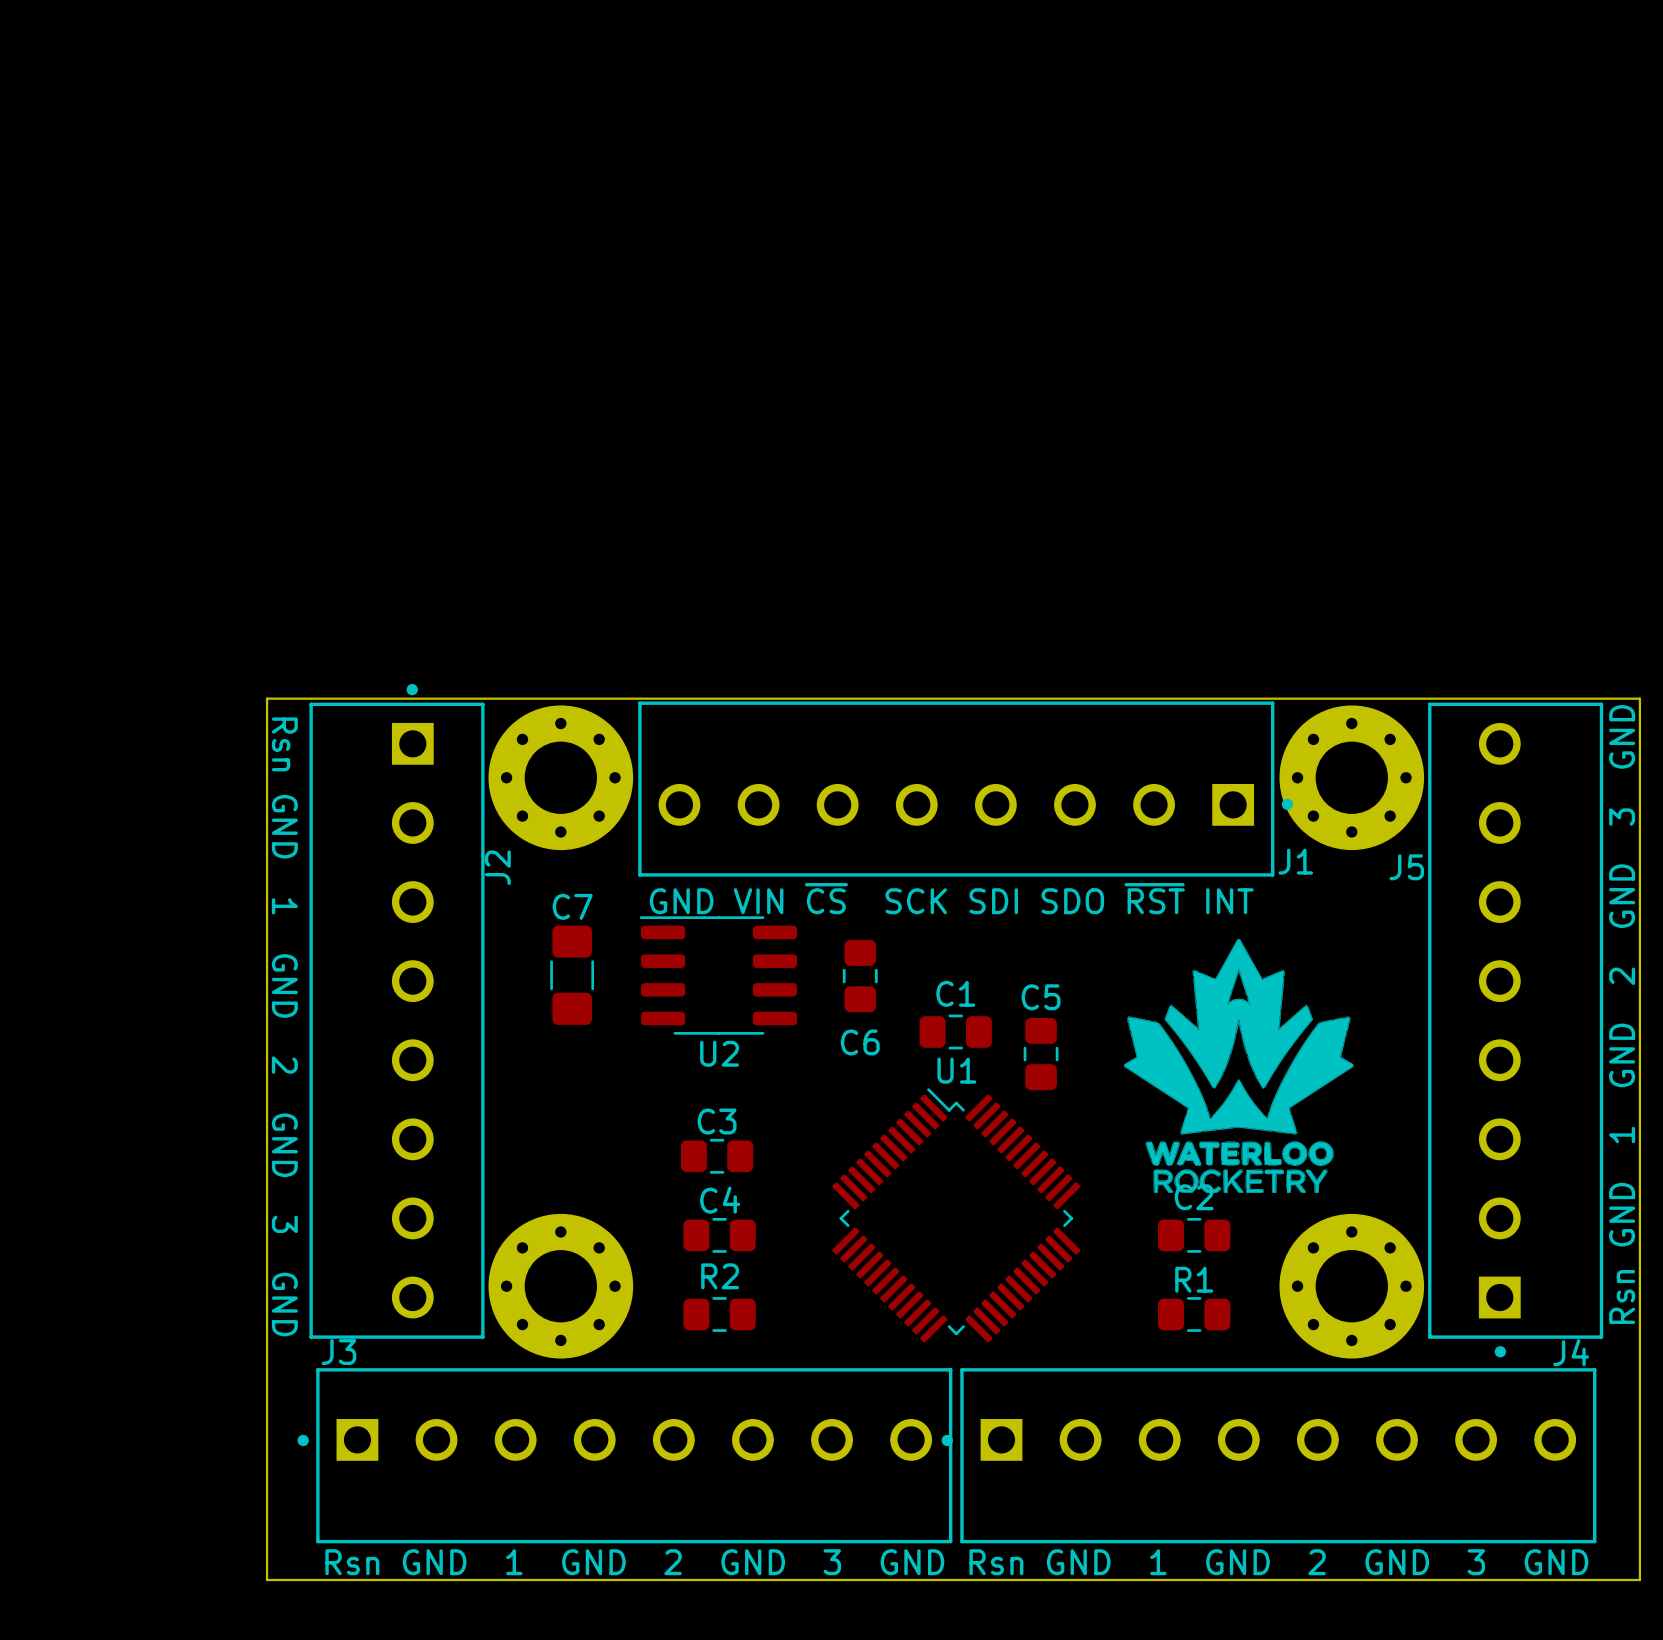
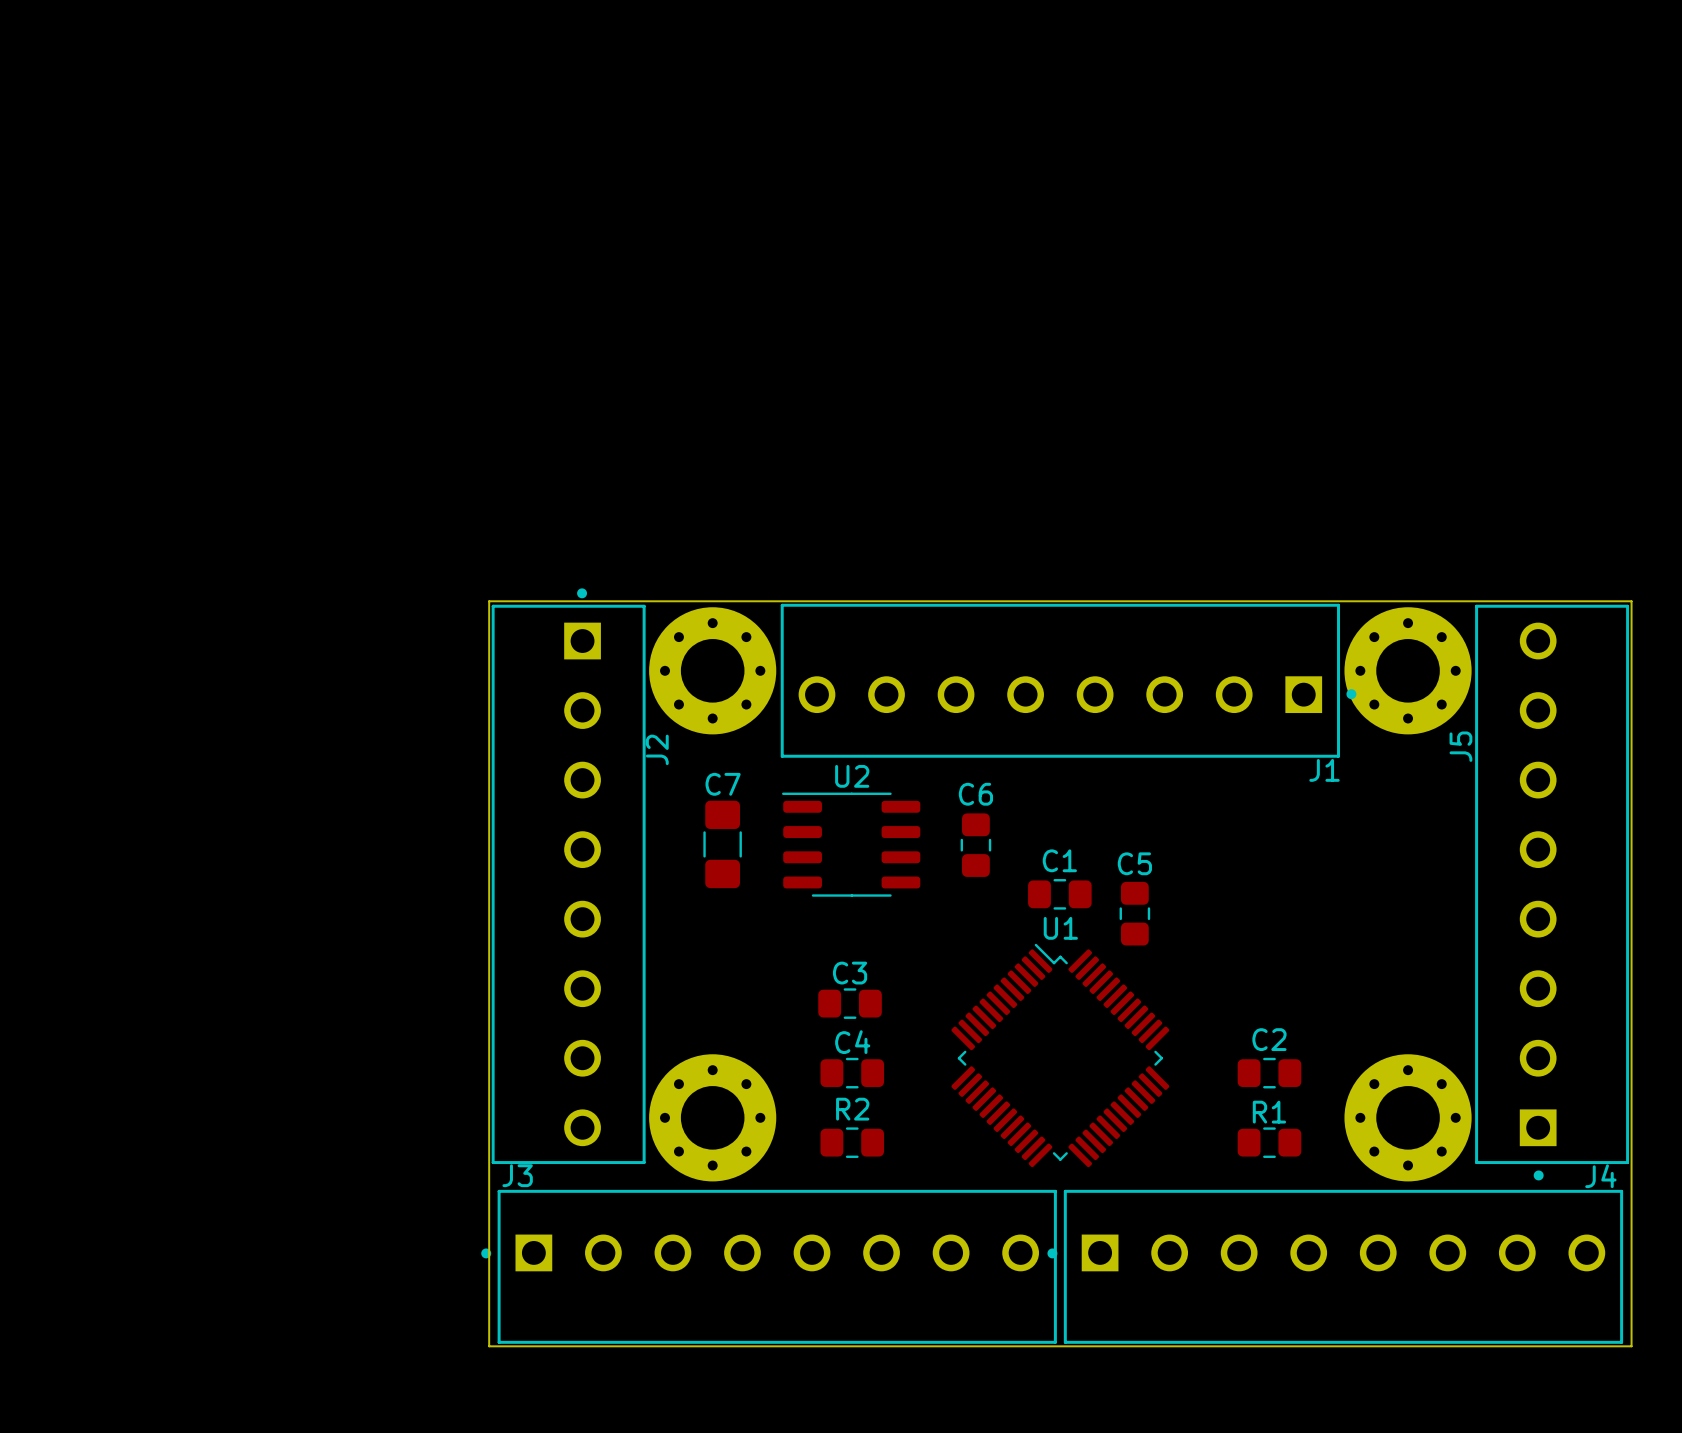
board edge: (306, 698) (267, 698) (267, 1580) (1639, 1580) (1639, 698) (1606, 698) -> (489, 601) (489, 1346) (1631, 1346) (1631, 601)
J1 name position: J1 (1295, 861) -> J1 (1324, 770)
J5 name rotation: 0° (1406, 867) -> 90° counterclockwise (1460, 746)
text: GND VIN ~{CS} SCK SDI SDO ~{RST} INT (951, 898) -> none
drawing: [1123, 939, 1354, 1194] -> none
text: Rsn GND 1 GND 2 GND 3 GND (1622, 1014) -> none
text: Rsn GND 1 GND 2 GND 3 GND (284, 1026) -> none
C6 name position: C6 (860, 1042) -> C6 (975, 794)
U2 name position: U2 (719, 1053) -> U2 (852, 776)
text: Rsn GND 1 GND 2 GND 3 GND (634, 1562) -> none
text: Rsn GND 1 GND 2 GND 3 GND (1278, 1562) -> none

